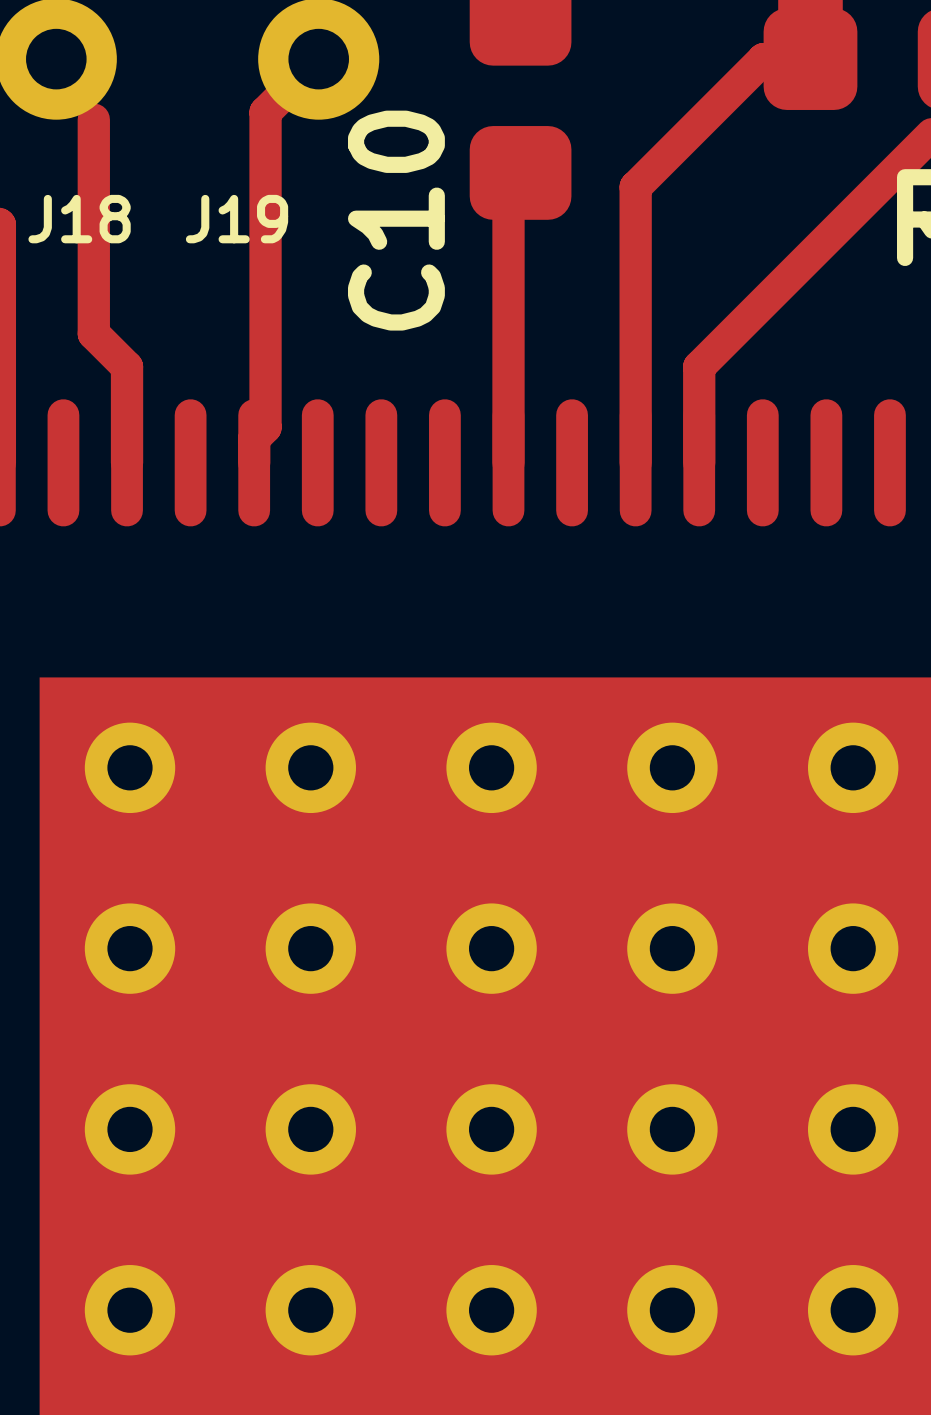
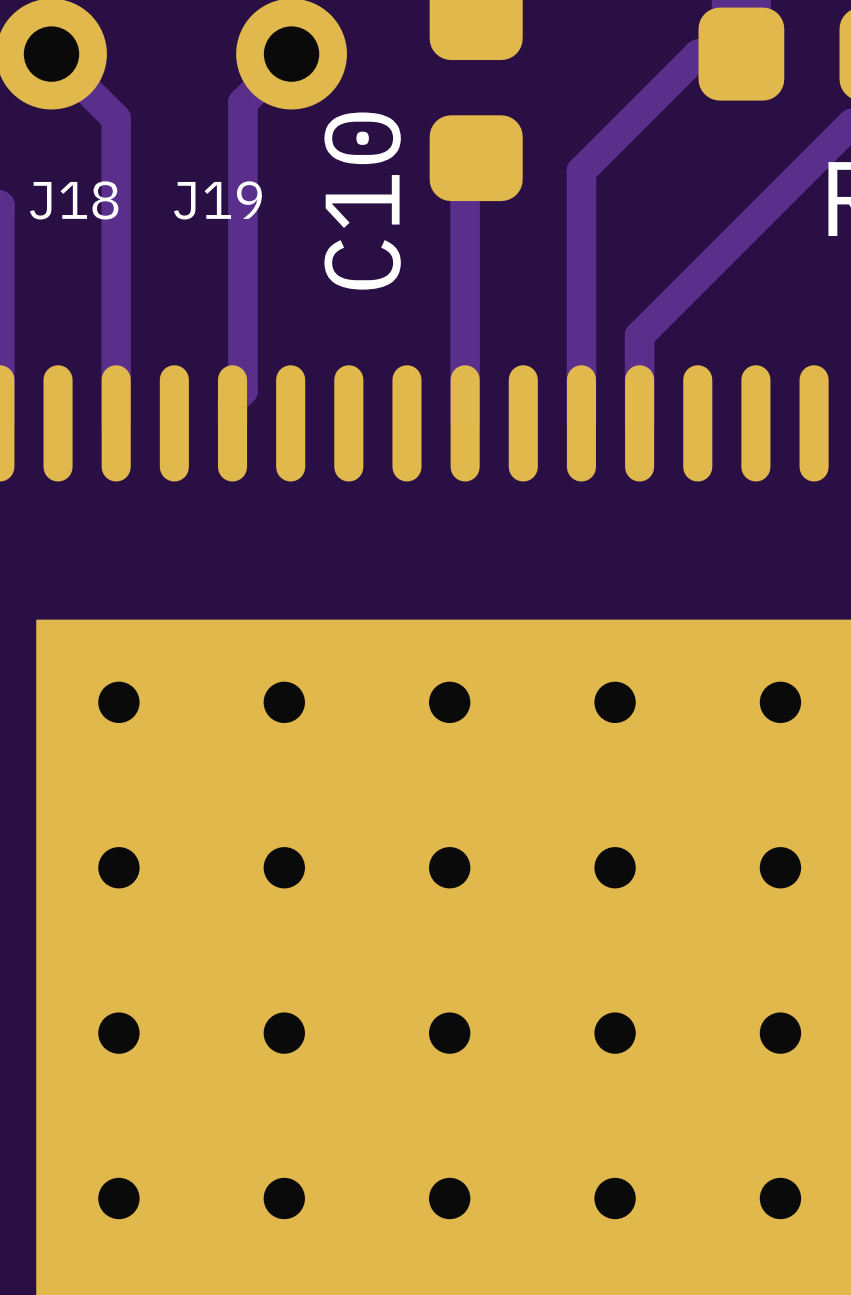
track: (93, 119) (93, 333) (127, 366) -> (51, 54) (116, 118) (116, 335)

